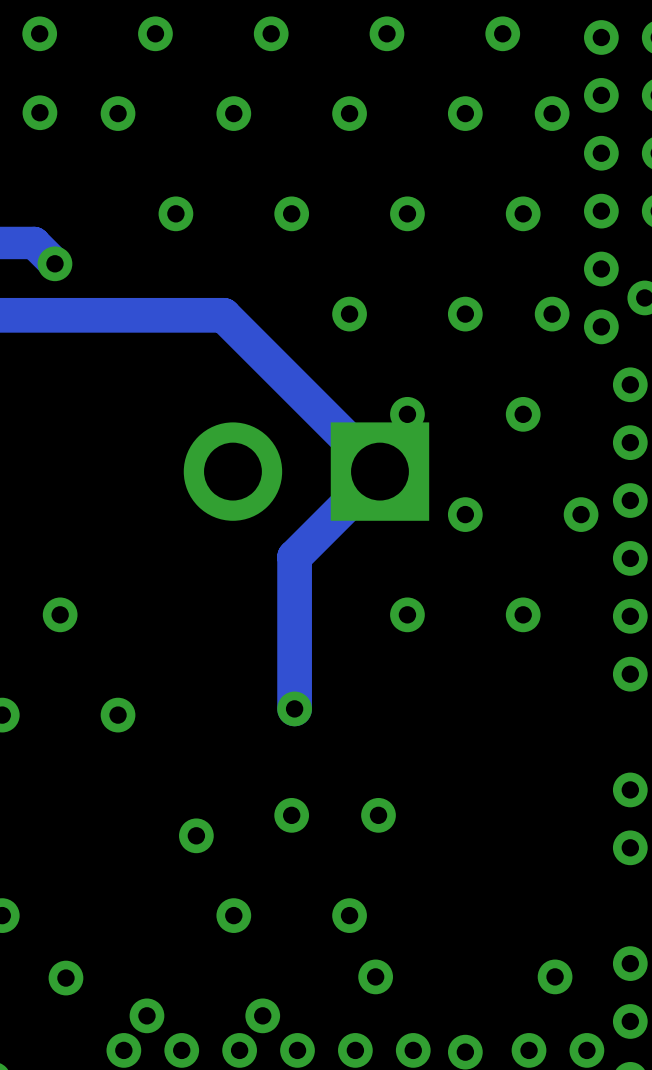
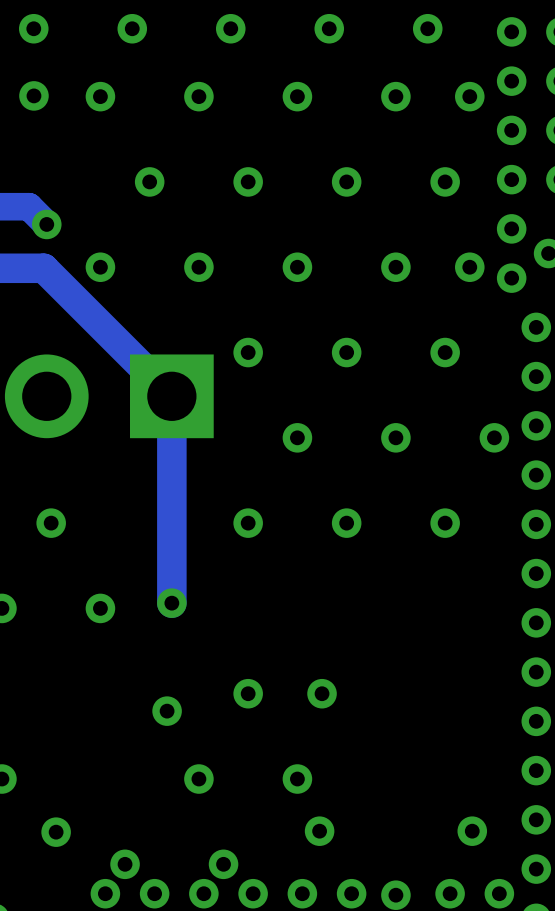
via: none -> (100, 267)
via: none -> (198, 267)
track: (51, 315) (223, 315) (379, 471) (294, 556) (294, 708) -> (43, 268) (171, 396) (171, 603)
via: none -> (248, 352)
part position: (306, 471) -> (109, 396)
via: none -> (297, 437)
via: none -> (248, 523)
via: none -> (171, 603)
via: (294, 708) -> none
via: none -> (536, 622)
via: none -> (536, 770)

